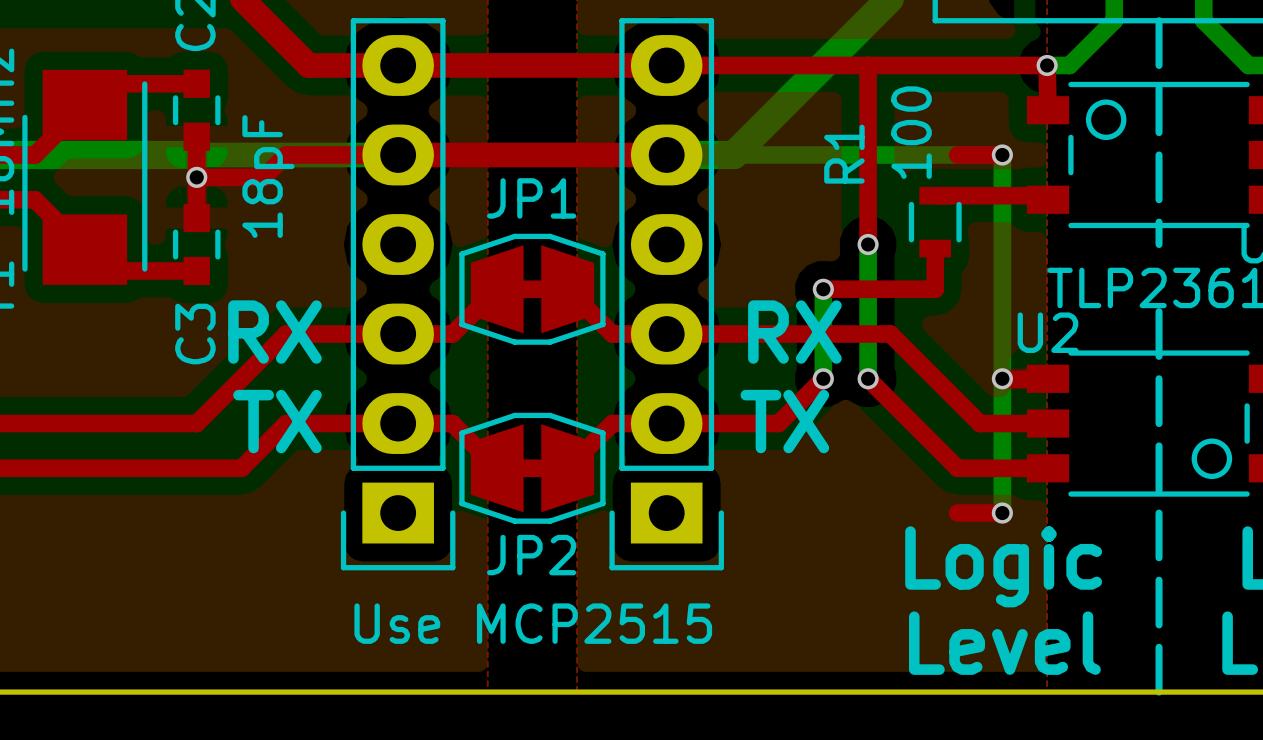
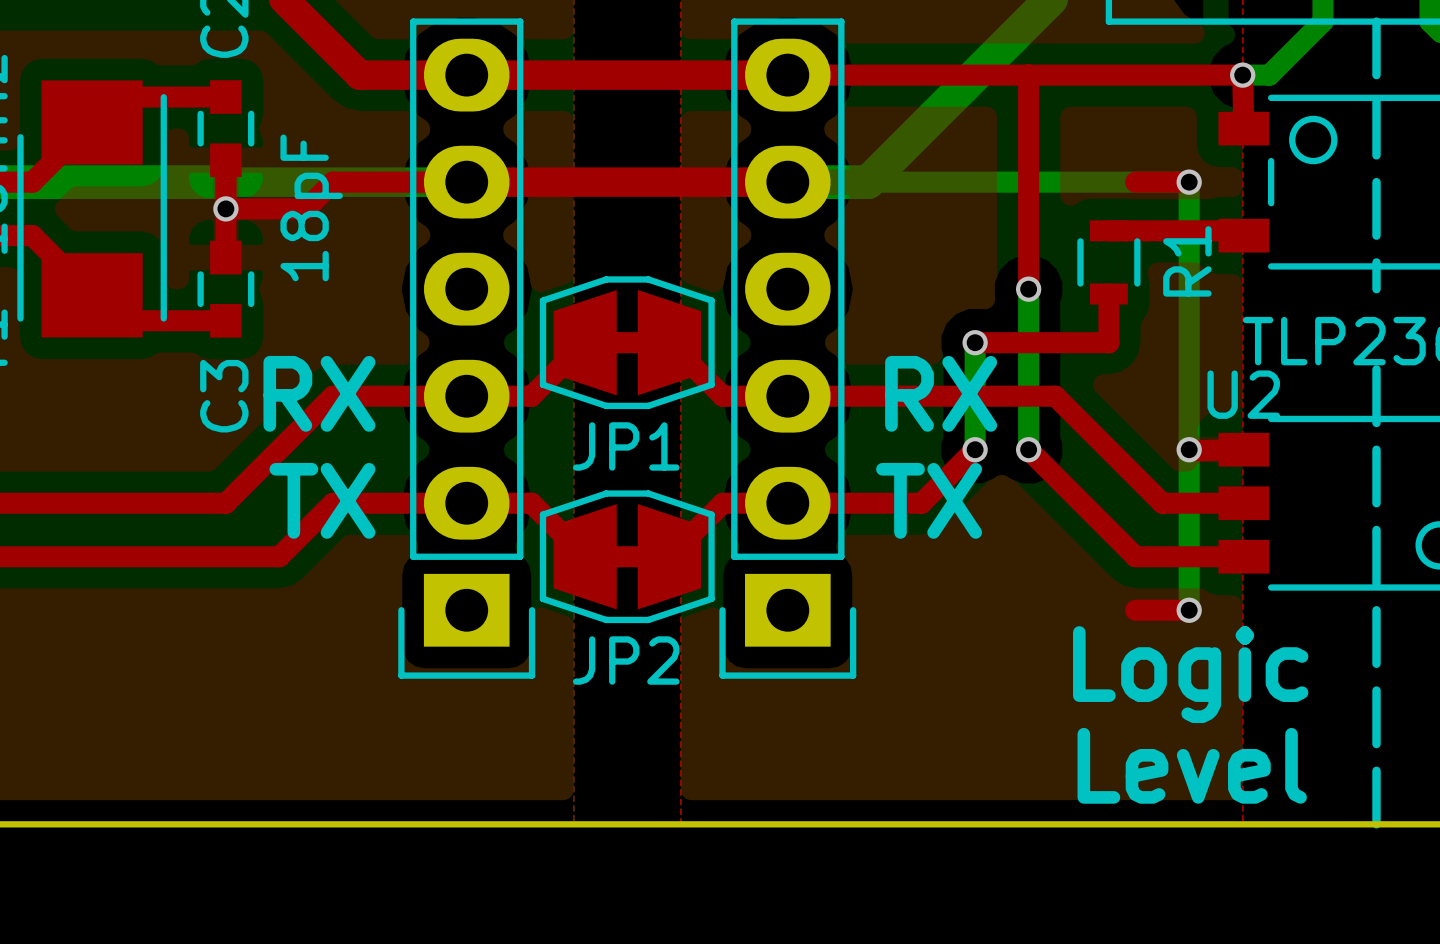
R1 value: 100 (911, 132) -> none
R1 name position: R1 (844, 154) -> R1 (1187, 261)
JP1 name position: JP1 (531, 198) -> JP1 (626, 446)
JP2 value: Use MCP2515 (533, 623) -> none

